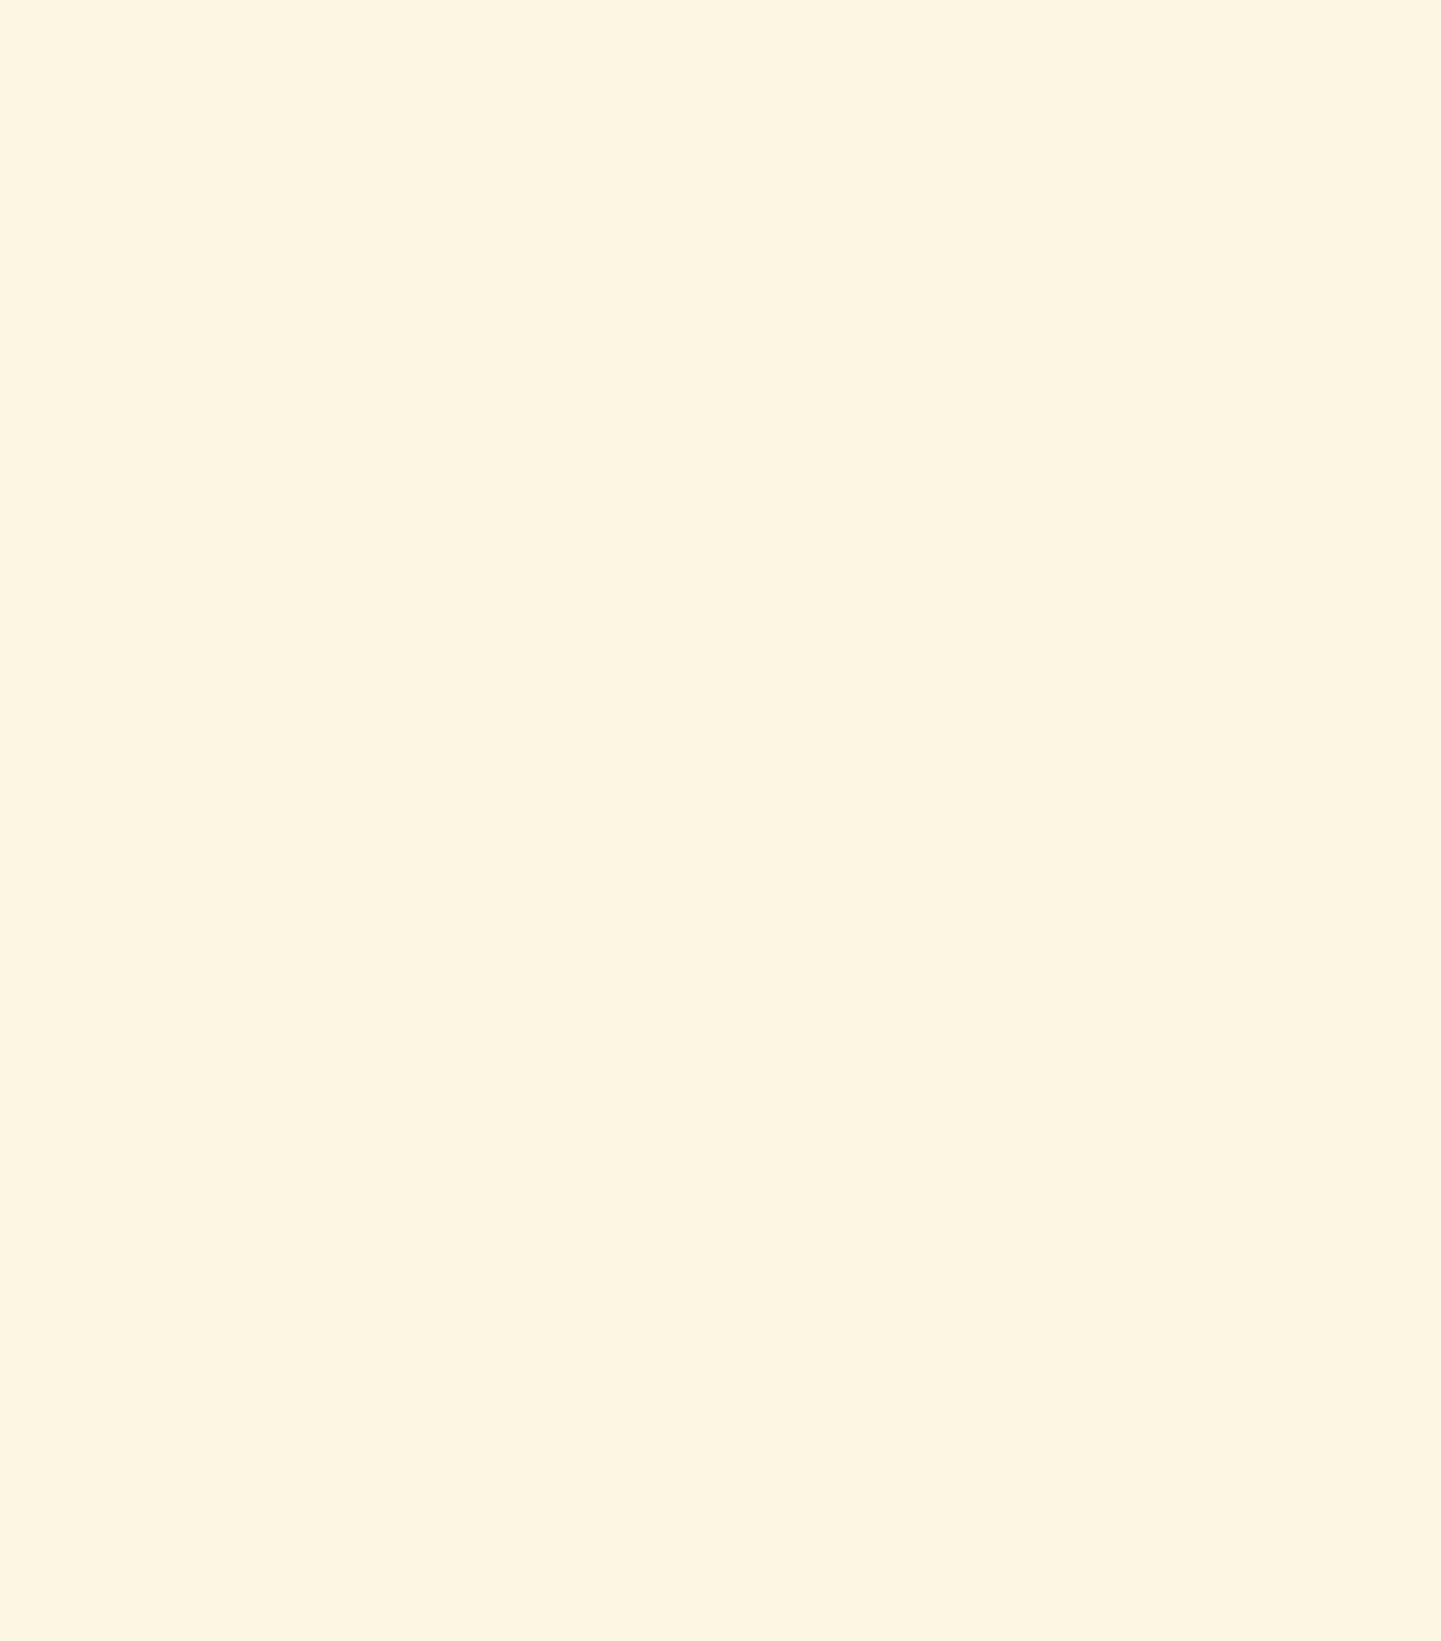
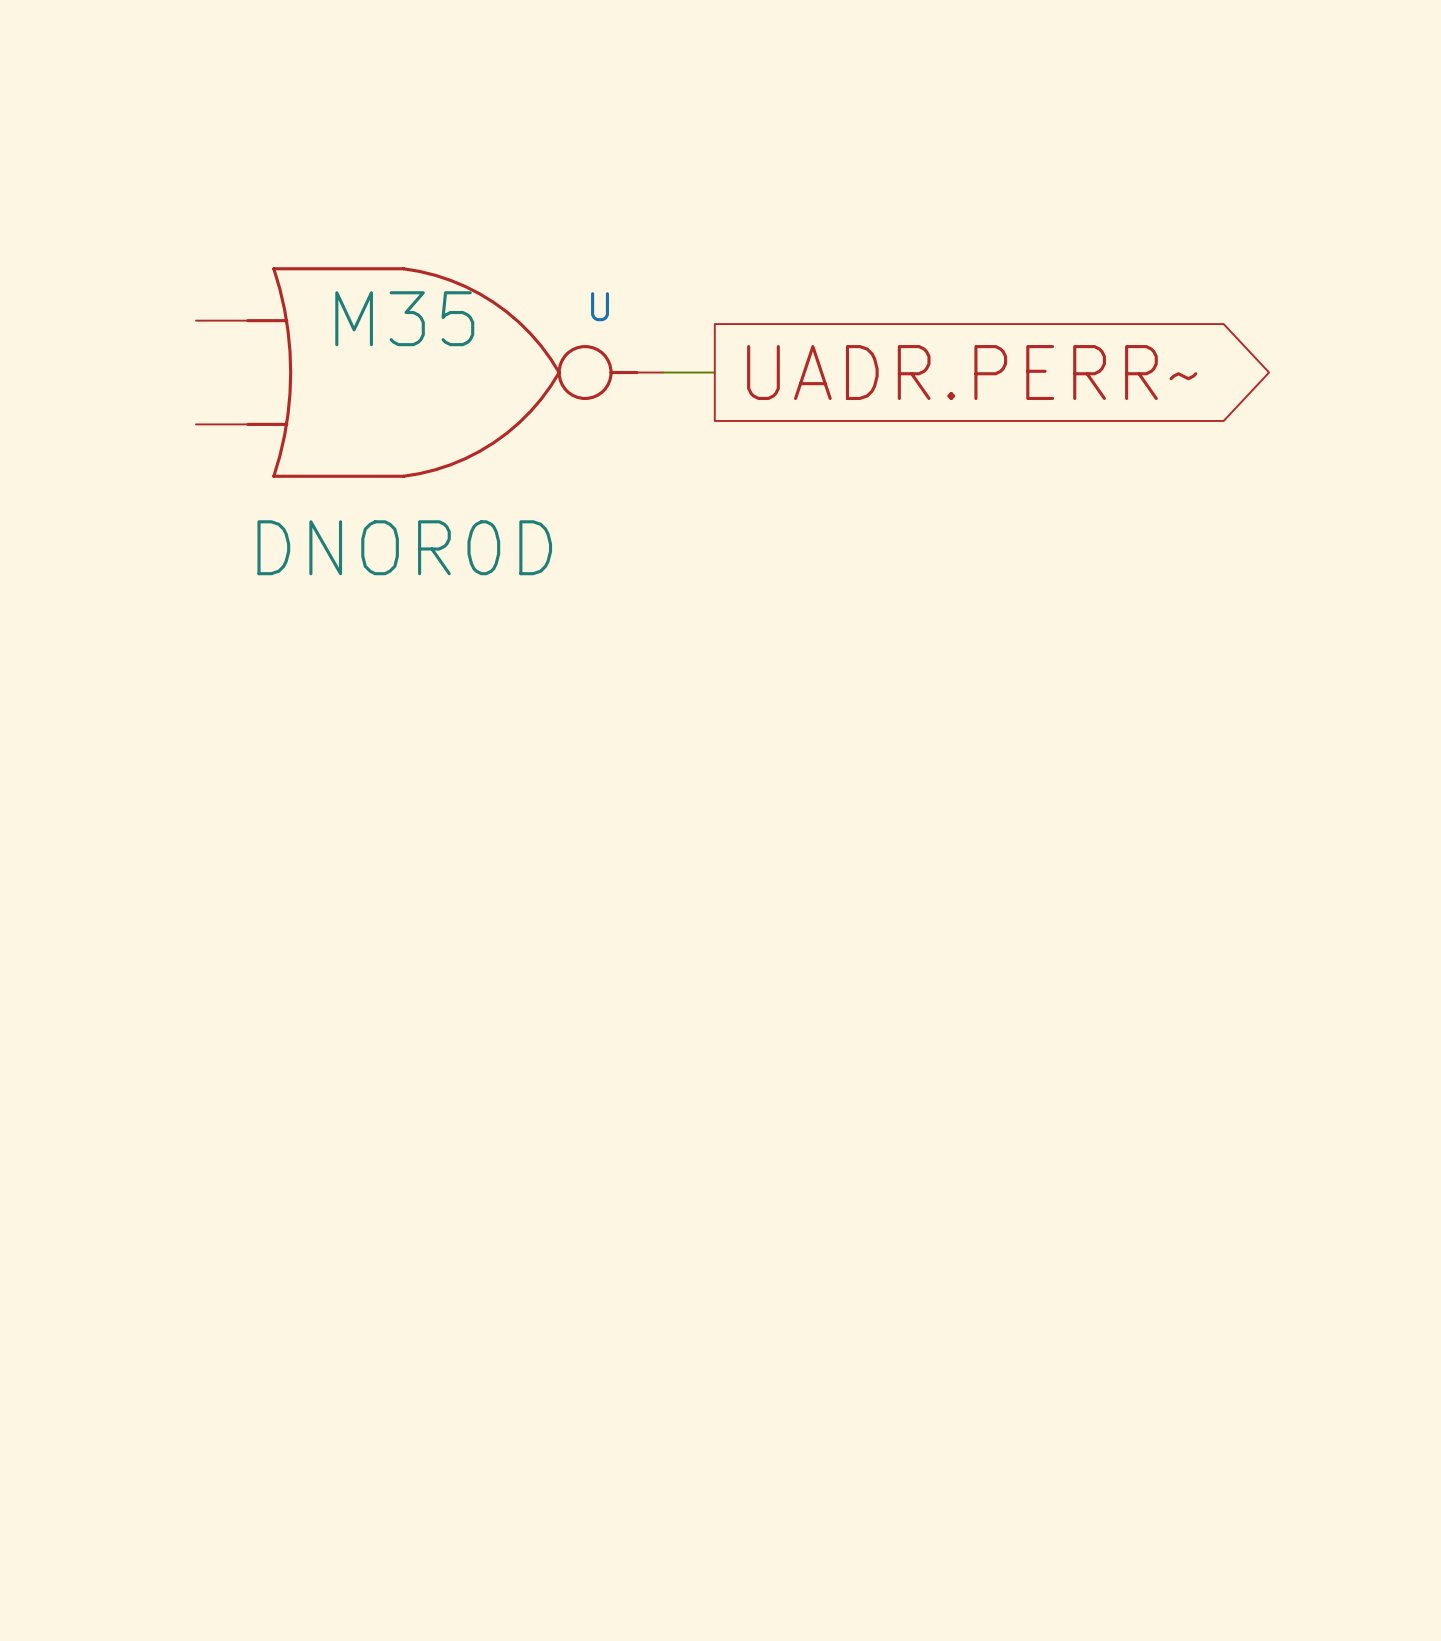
U: none -> (429, 372)
wire: none -> (662, 372) (714, 372)
global label: none -> UADR.PERR~ (972, 372)

